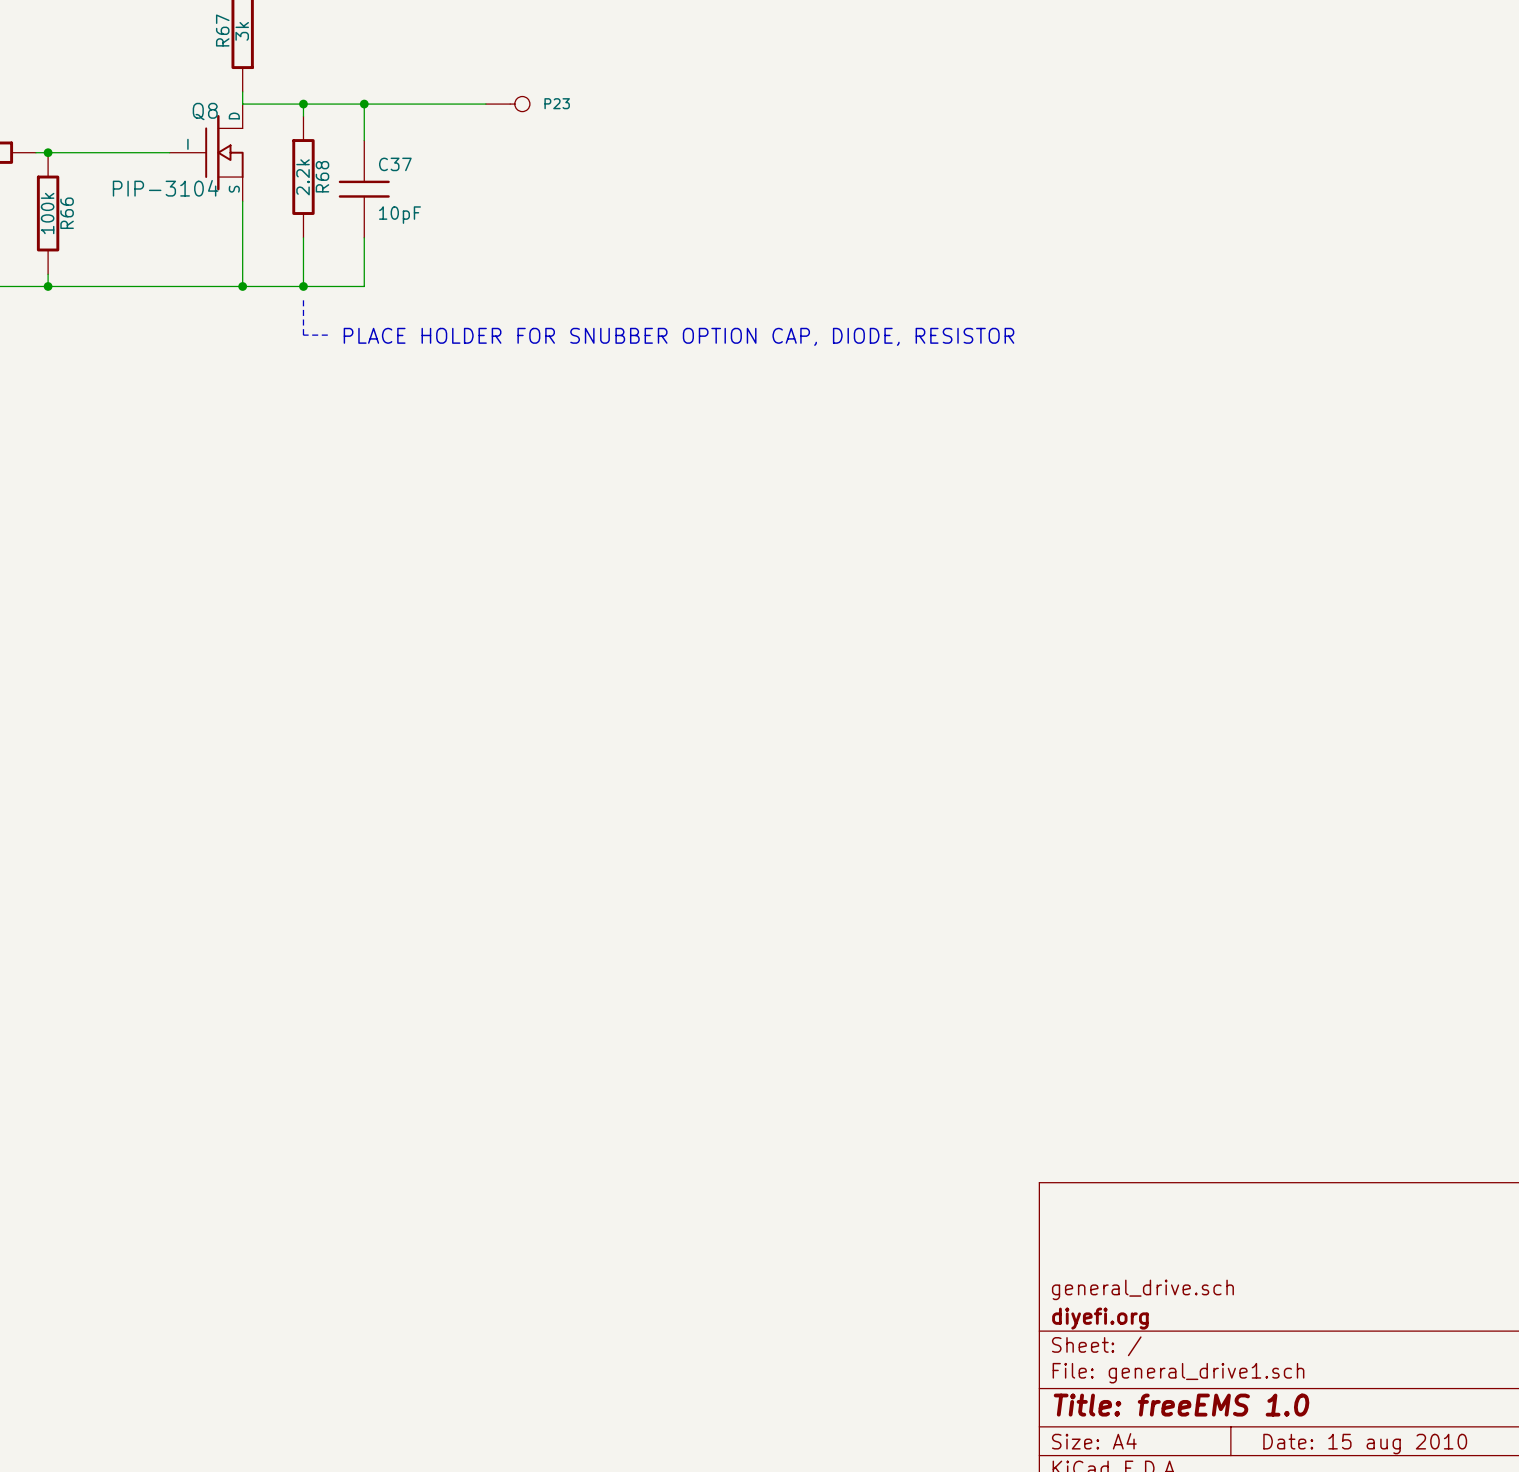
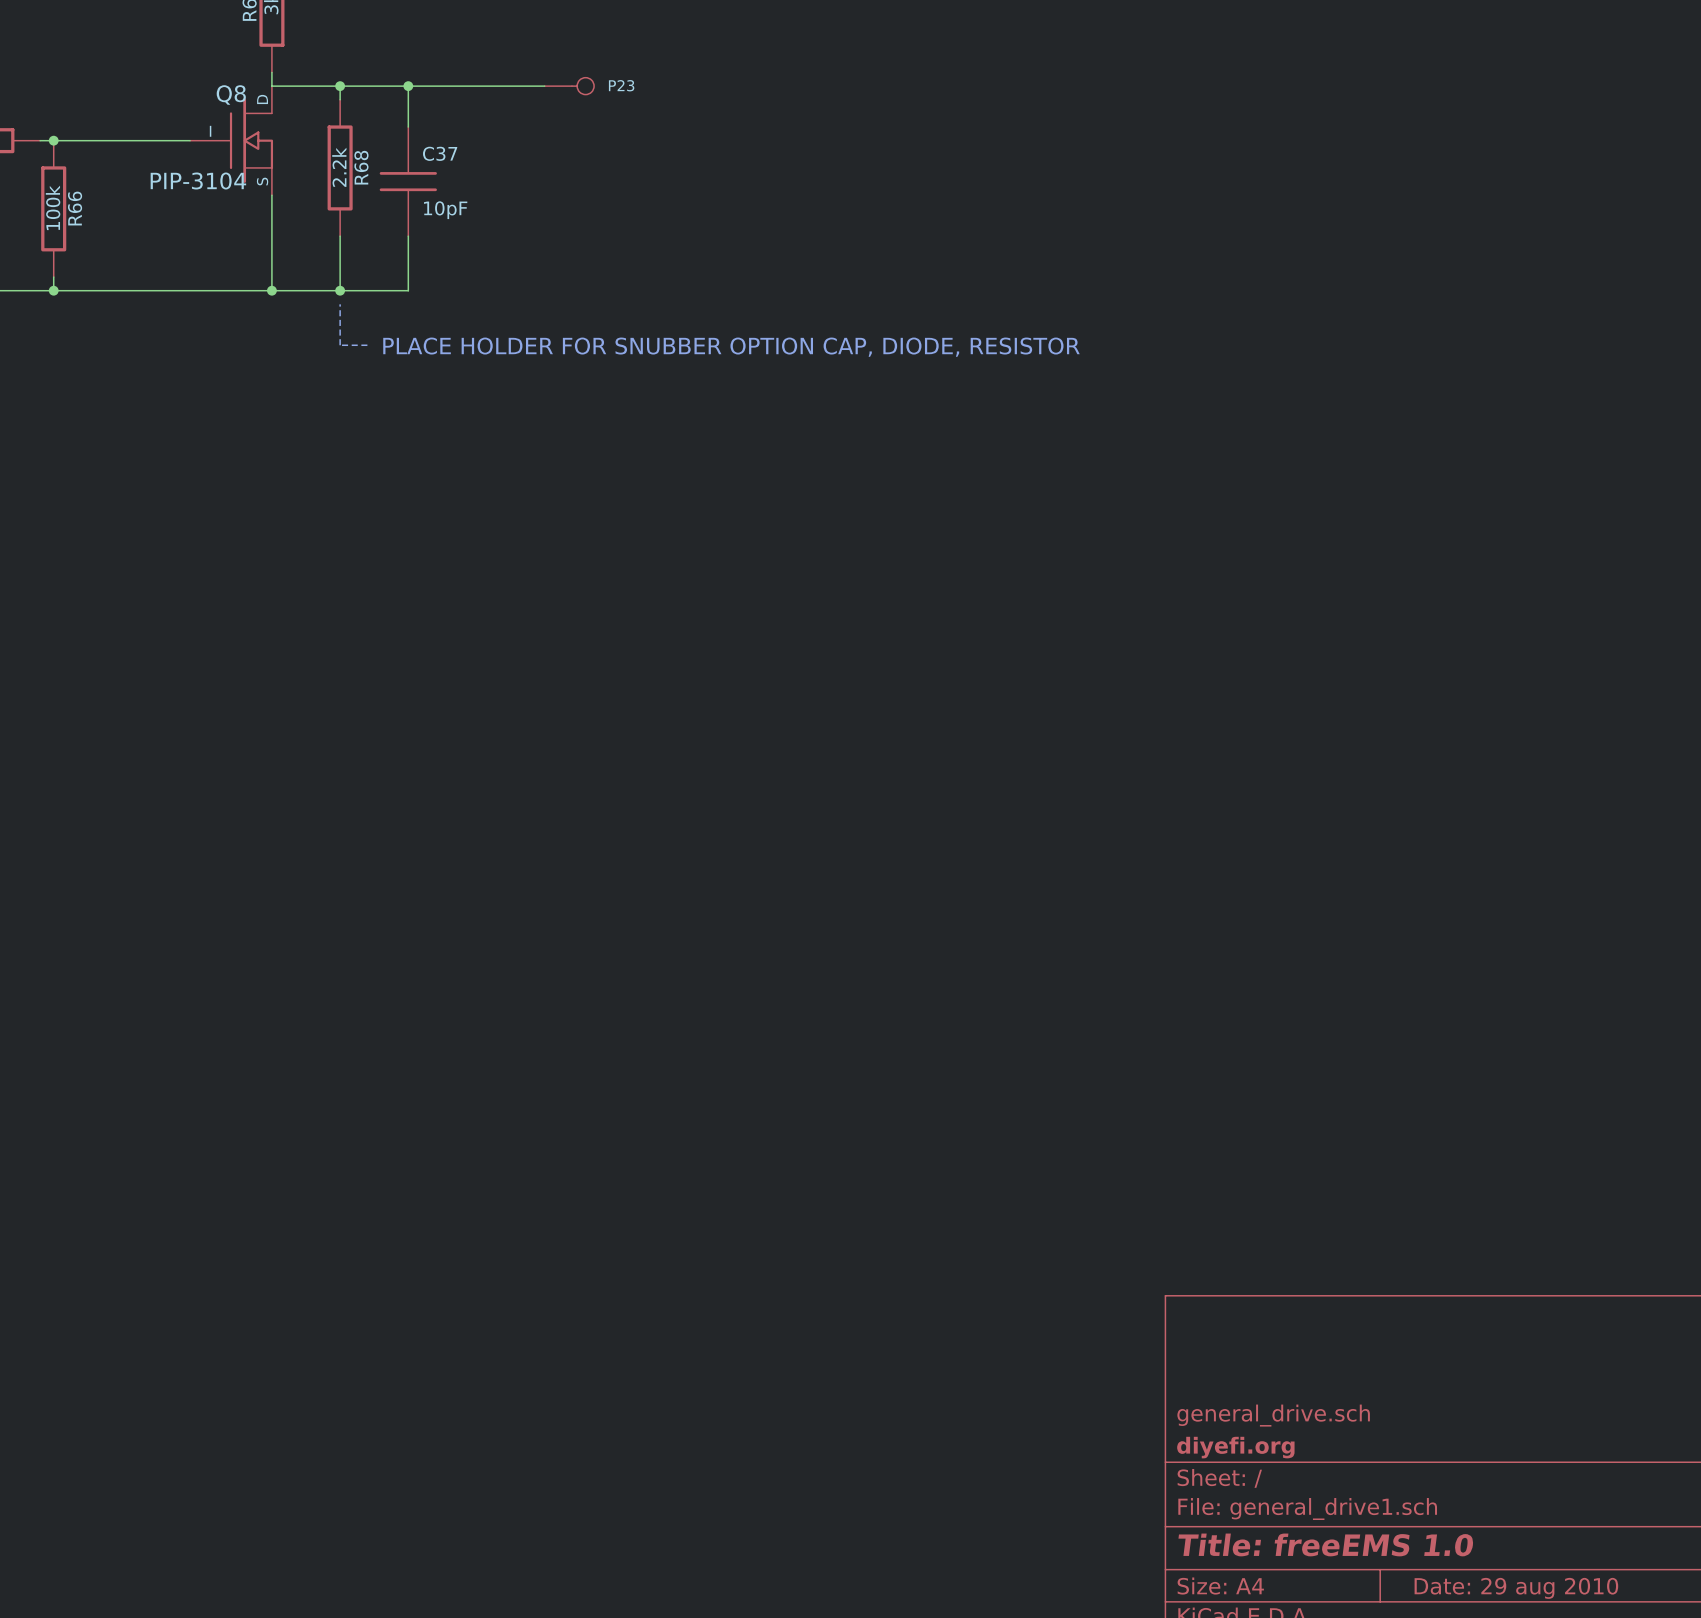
title block: Date: 15 aug 2010 (1365, 1444) -> Date: 29 aug 2010 (1516, 1588)

